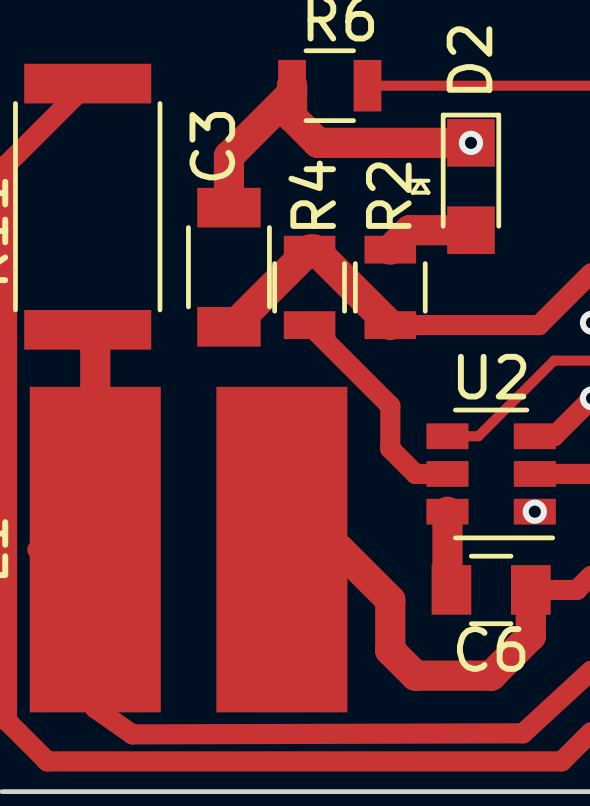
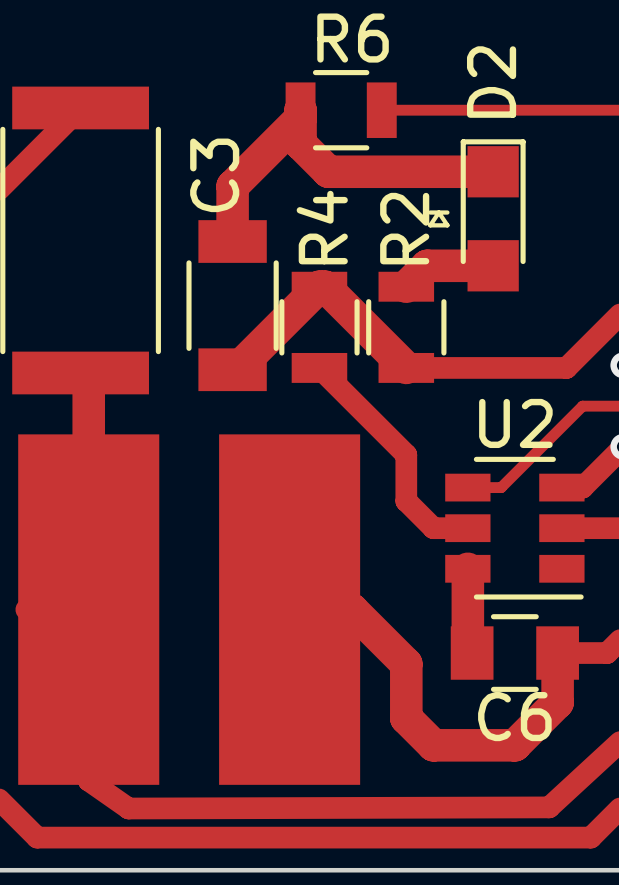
via: (470, 142) -> none
via: (534, 511) -> none

